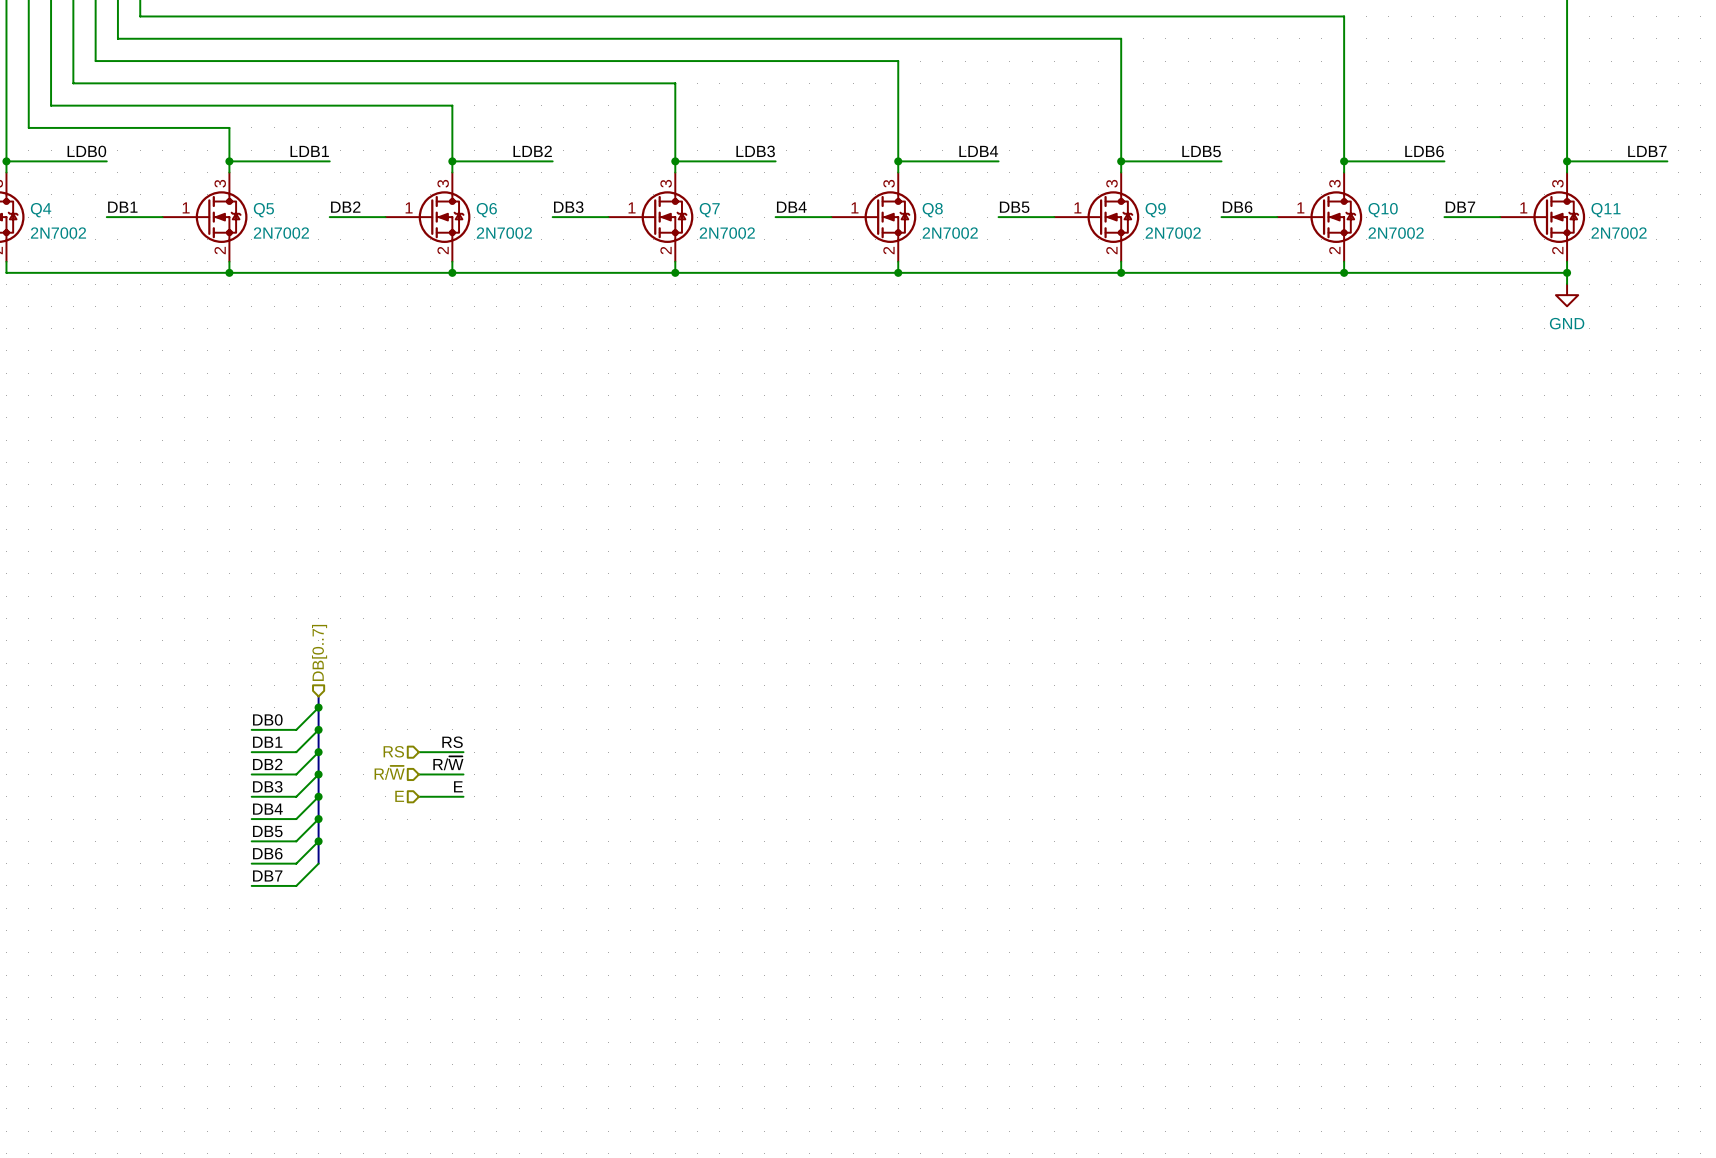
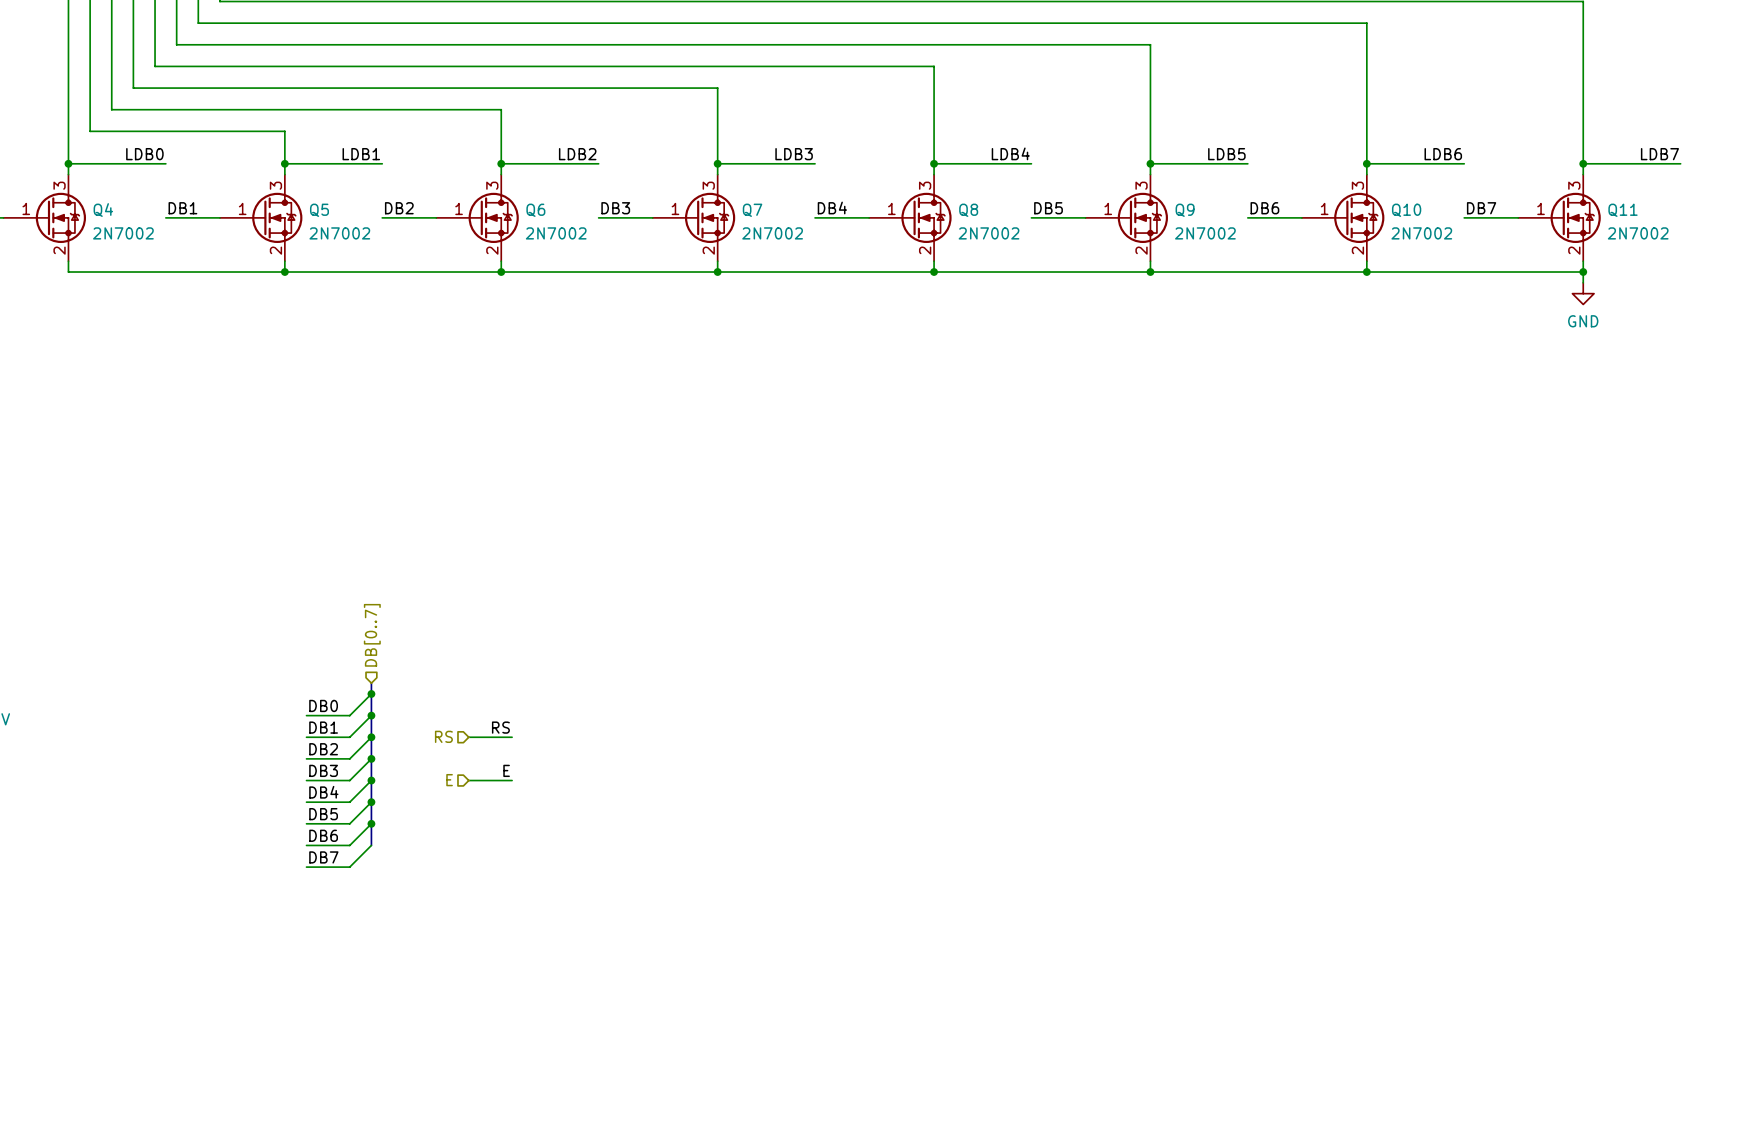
label: R/~{W} (448, 763) -> none
hierarchical label: R/~{W} (389, 772) -> none
wire: (418, 774) (463, 774) -> none

